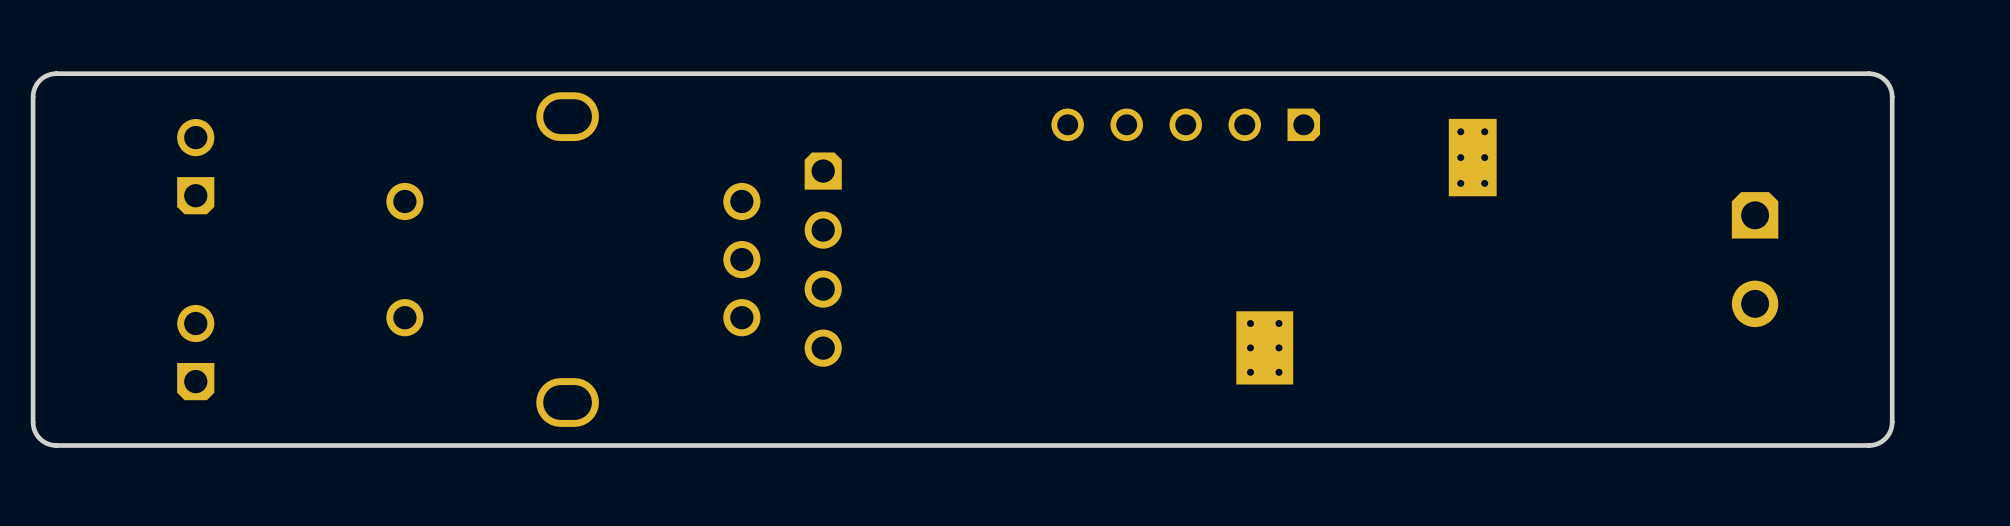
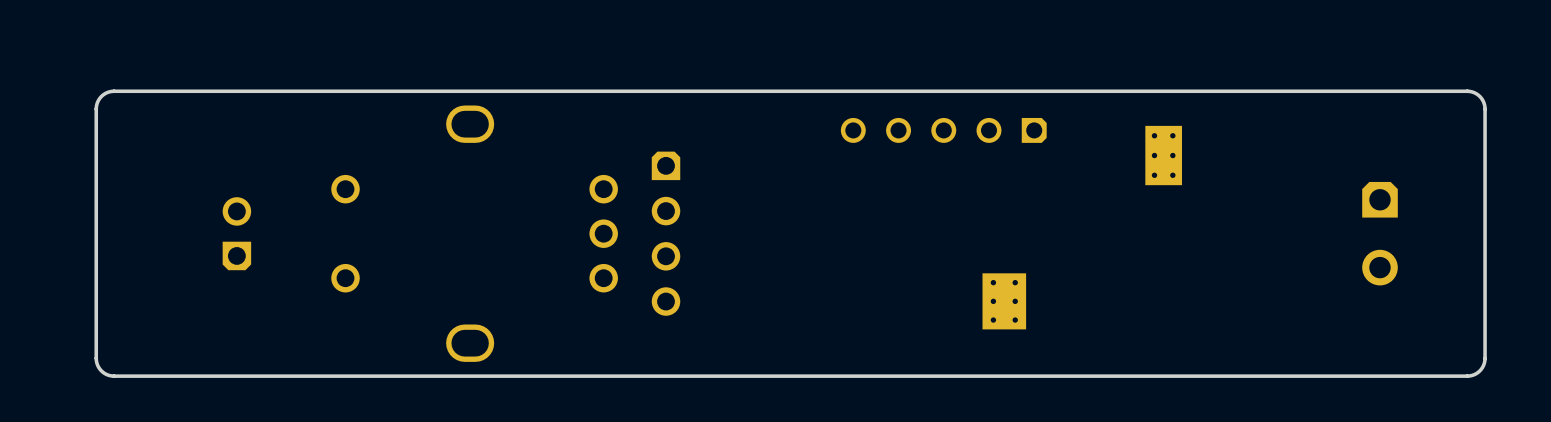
board edge: (102, 73) (50, 74) (37, 82) (33, 96) (33, 428) (39, 438) (50, 444) (102, 445) -> (114, 91) (101, 96) (96, 109) (96, 360) (103, 372) (114, 376)
part: (195, 166) -> none
part: none -> (236, 233)
part: (195, 352) -> none

